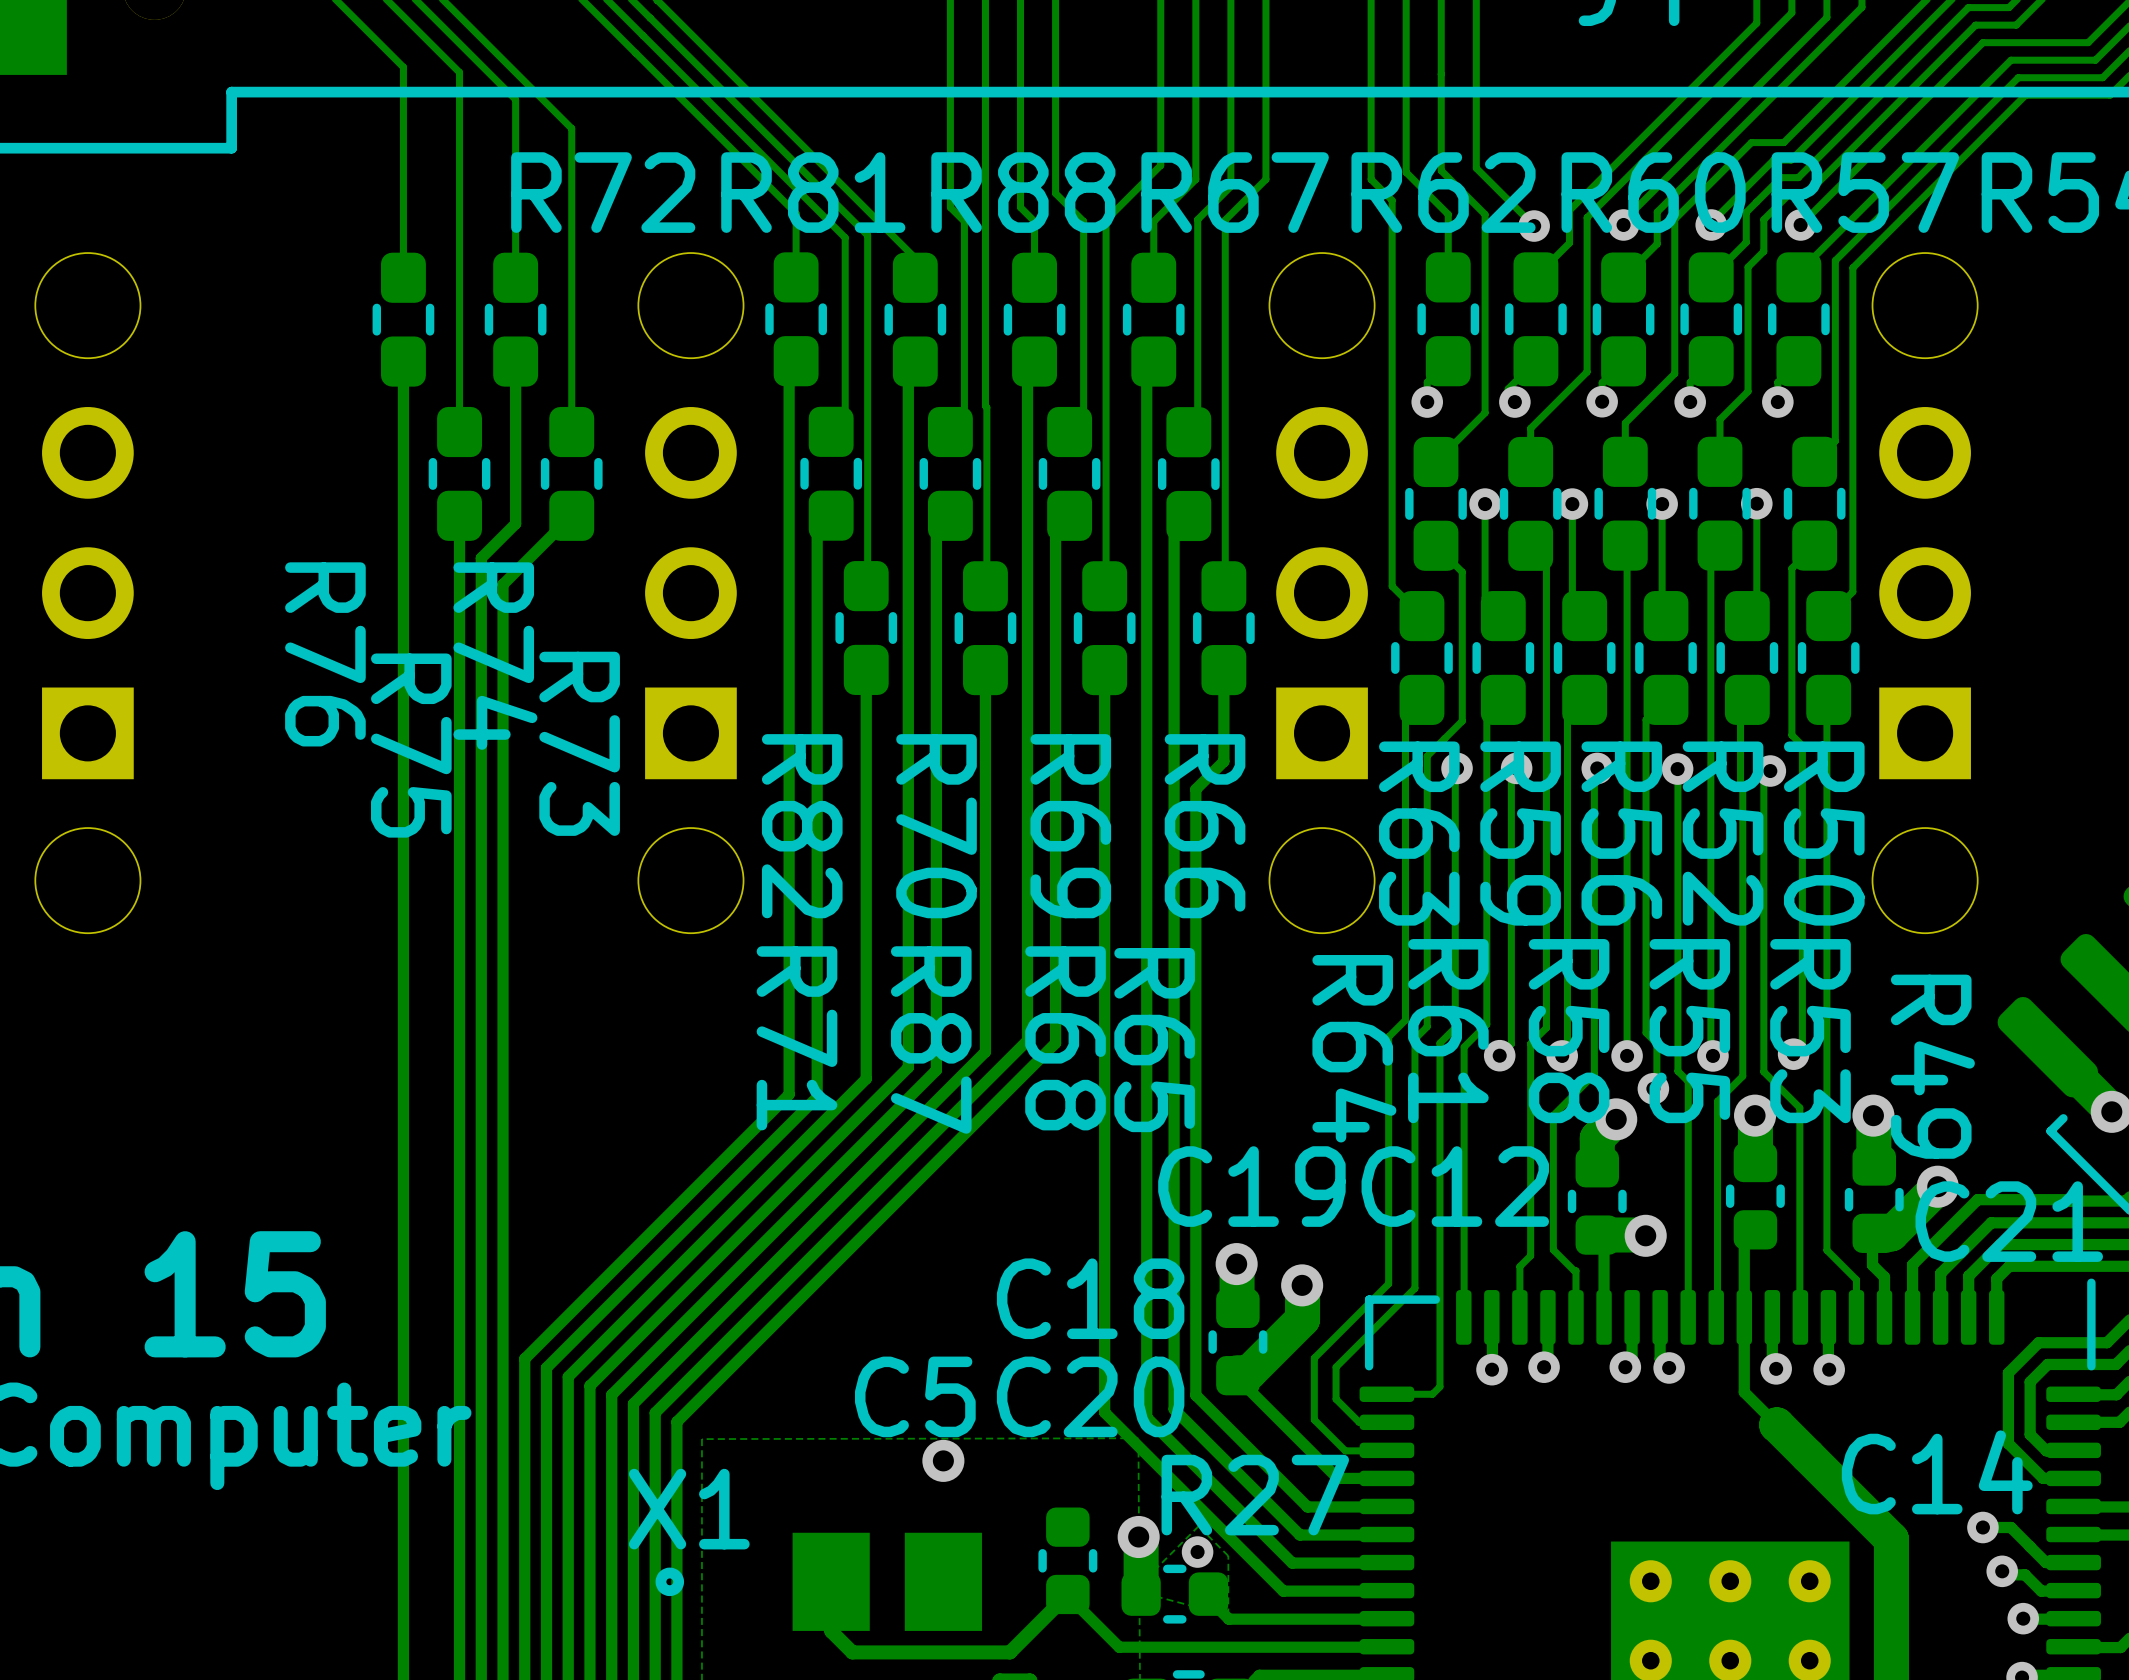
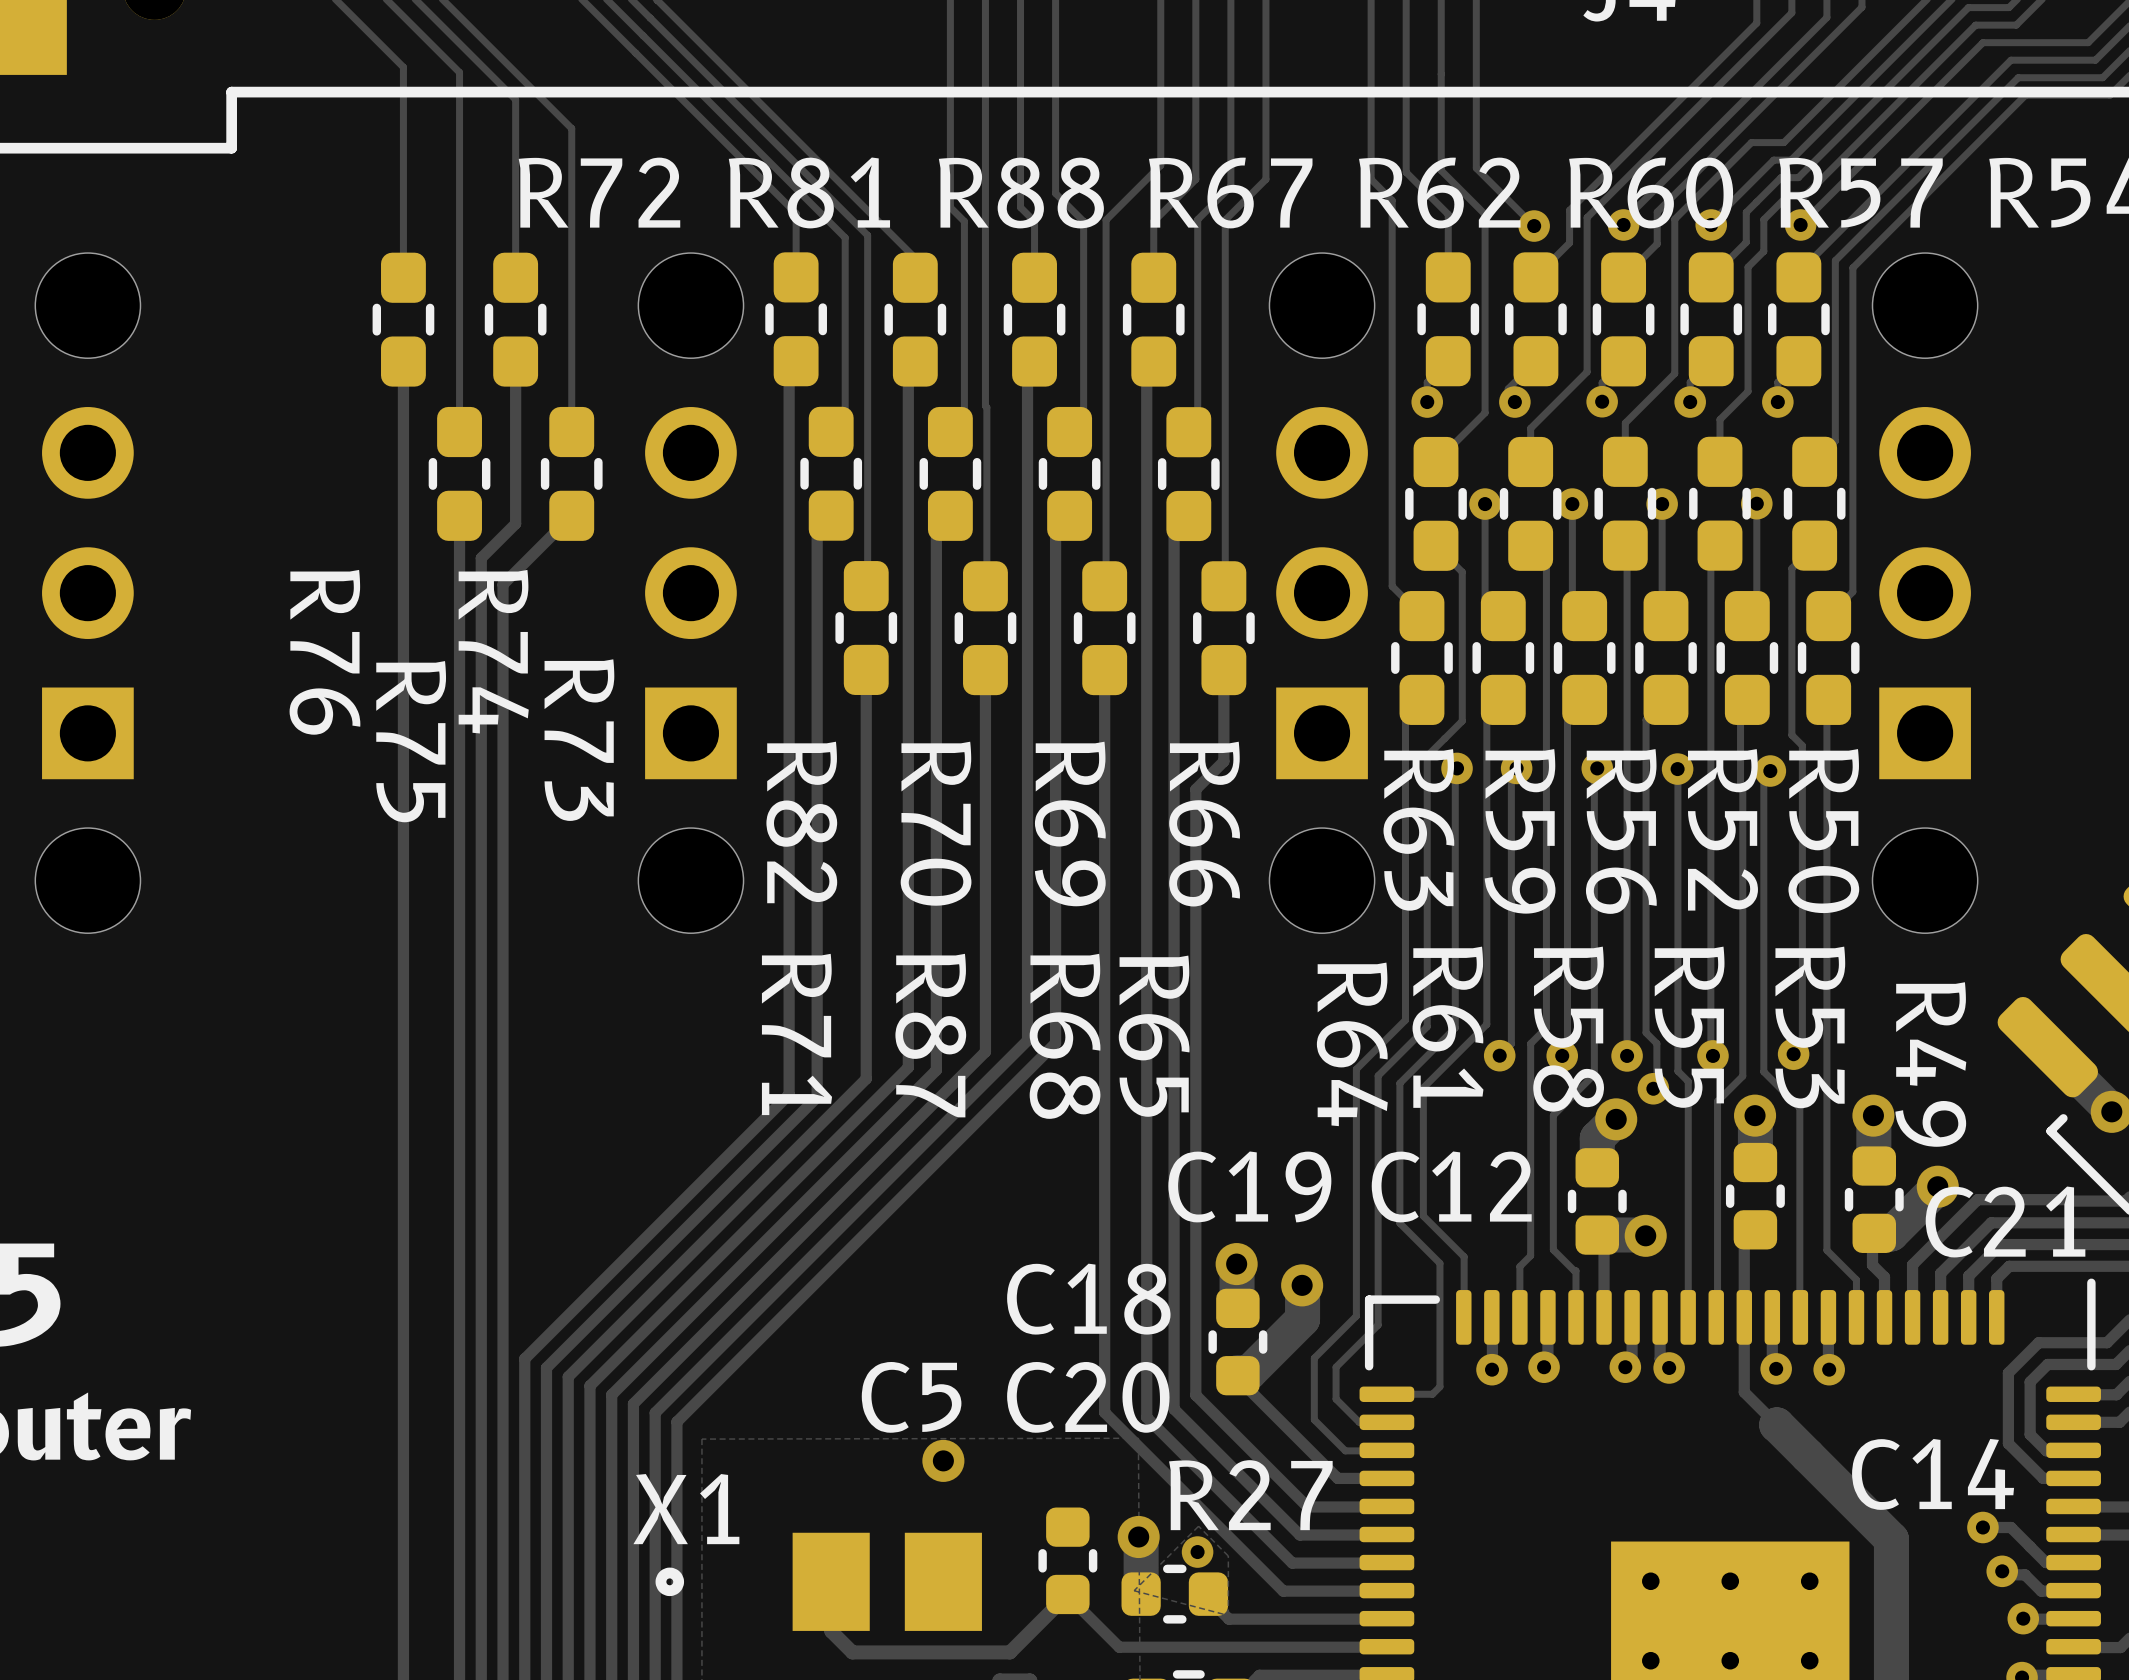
track: (1388, 1036) (1388, 1283) (1356, 1316) -> (1388, 1036) (1356, 1069) (1356, 1316)
track: (1414, 1039) (1414, 1288) (1378, 1325) -> (1414, 1039) (1378, 1075) (1378, 1325)
track: (1439, 1043) (1439, 1263) -> (1439, 1043) (1399, 1083) (1399, 1223) (1439, 1263)
track: (1464, 1047) (1464, 1256) -> (1464, 1047) (1423, 1087) (1423, 1216) (1464, 1256)

